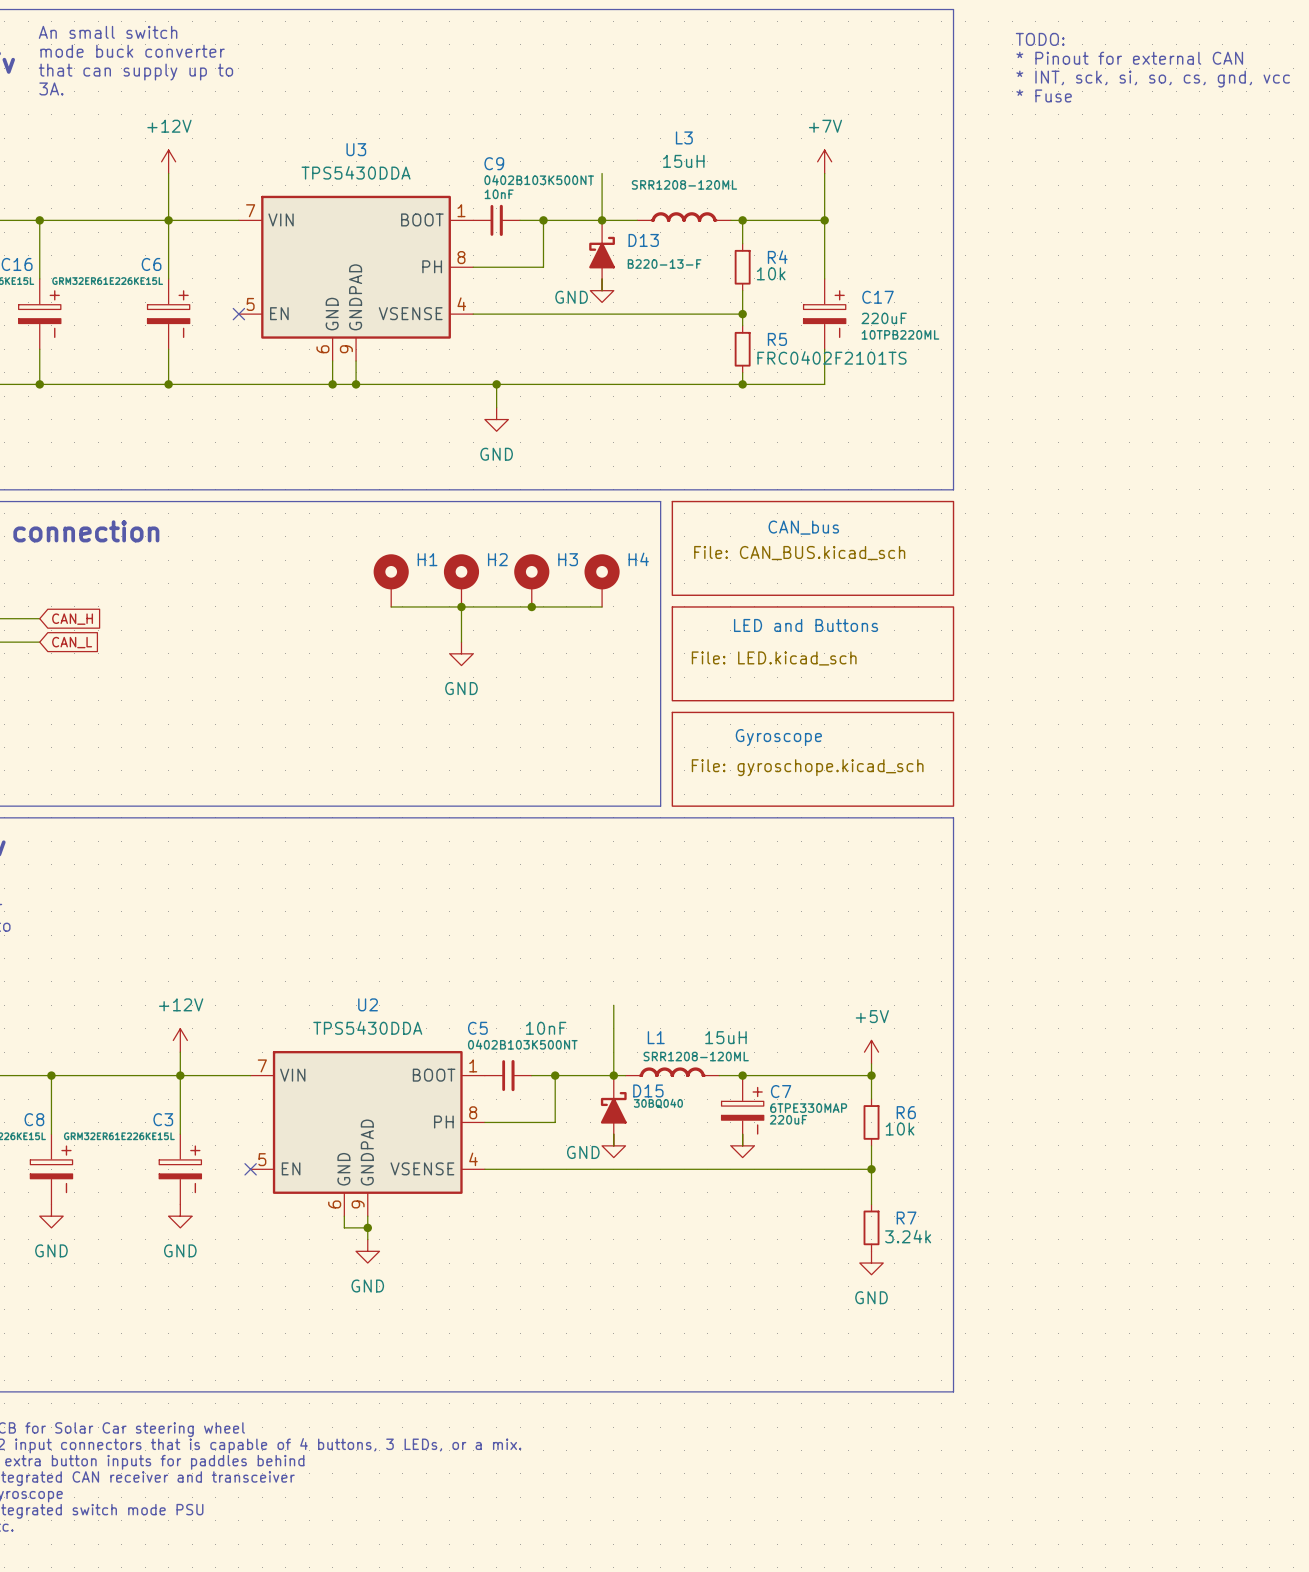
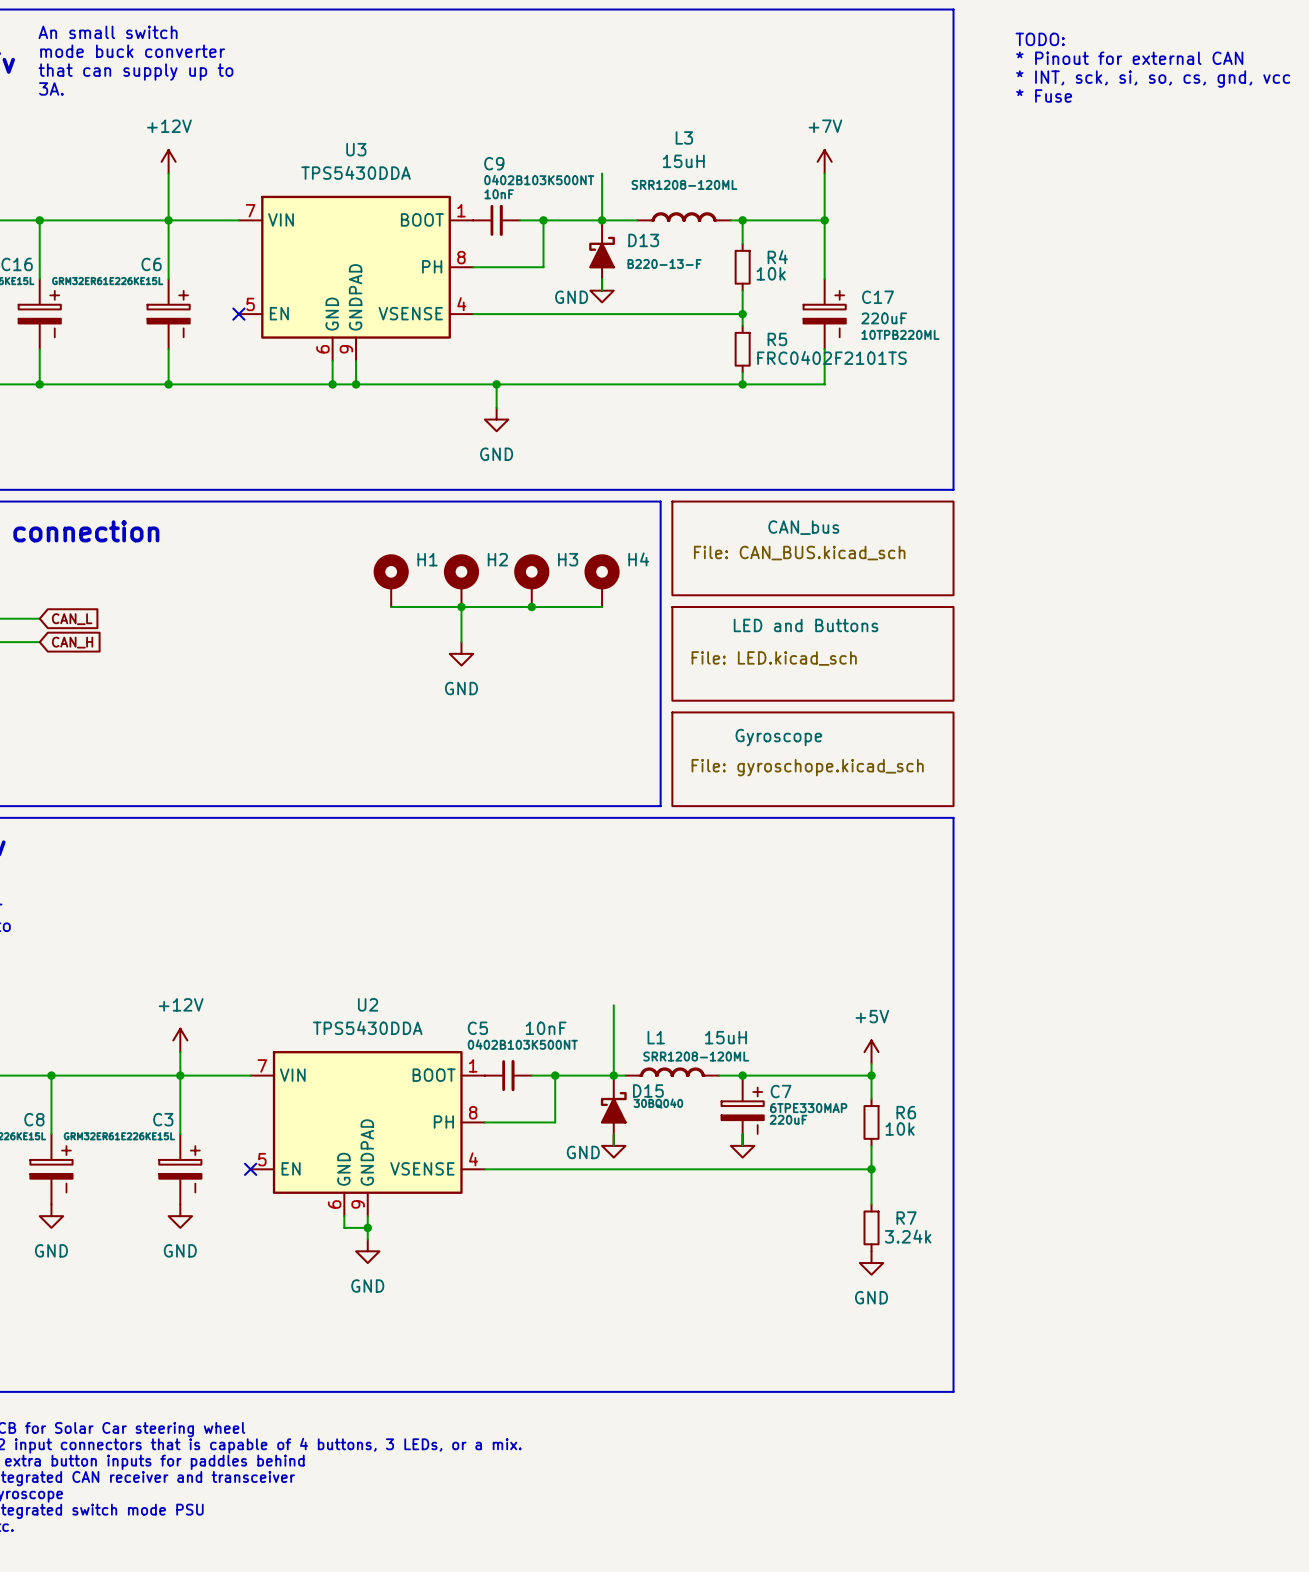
global label: CAN_H (72, 619) -> CAN_L (72, 619)
global label: CAN_L (72, 642) -> CAN_H (72, 642)

